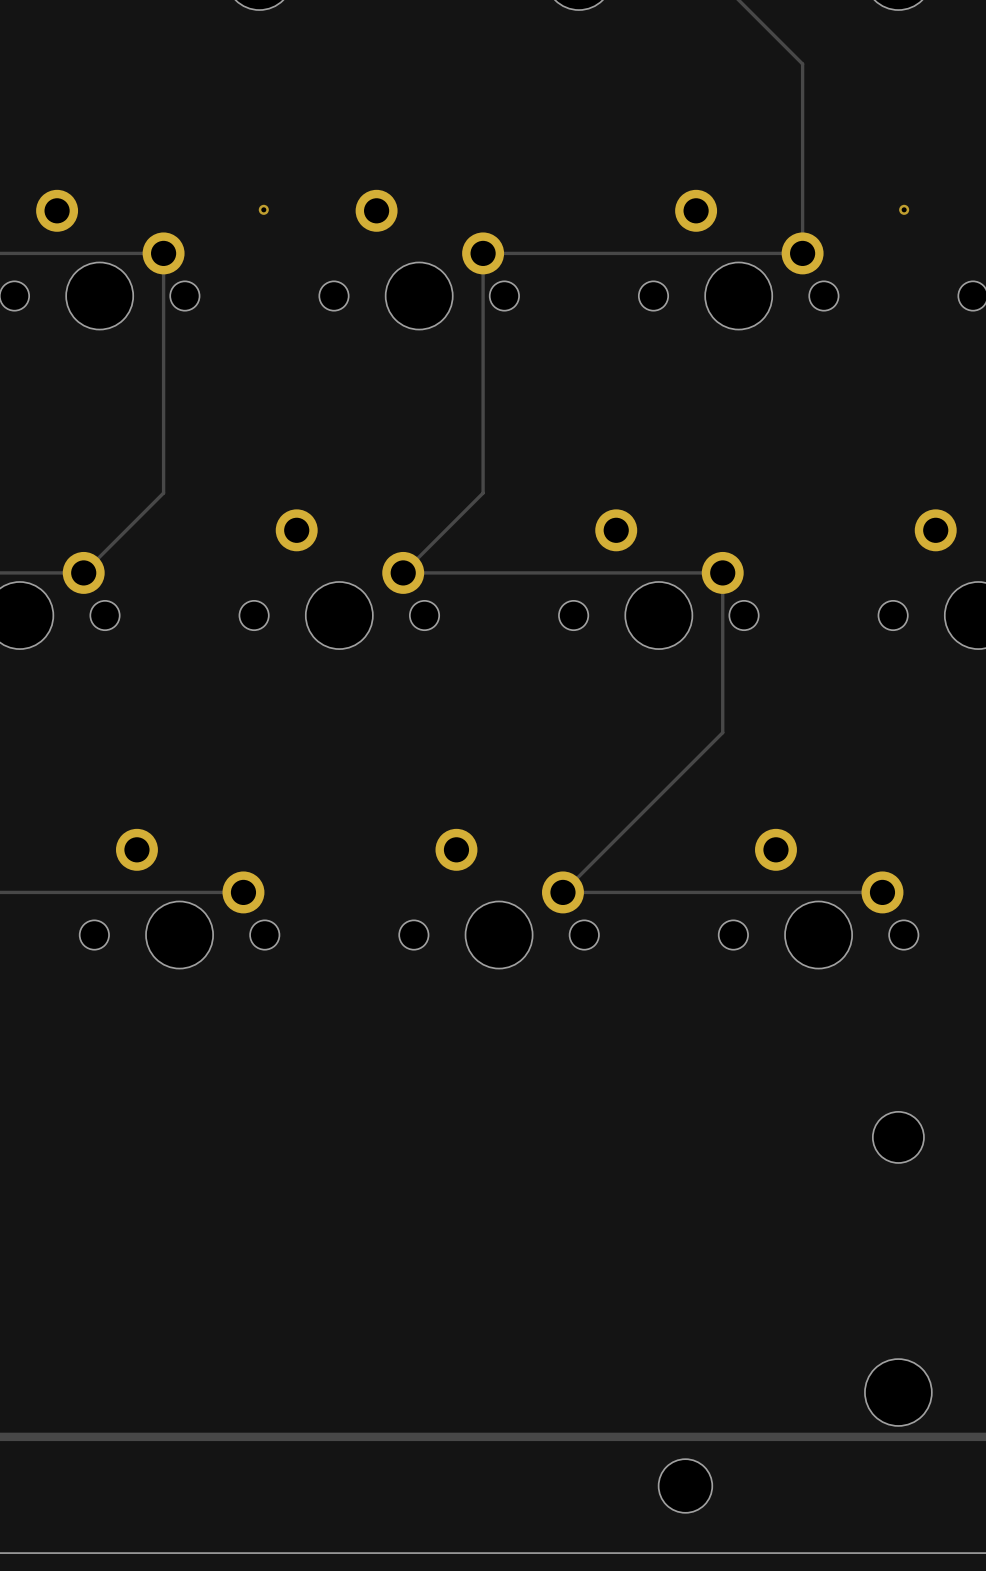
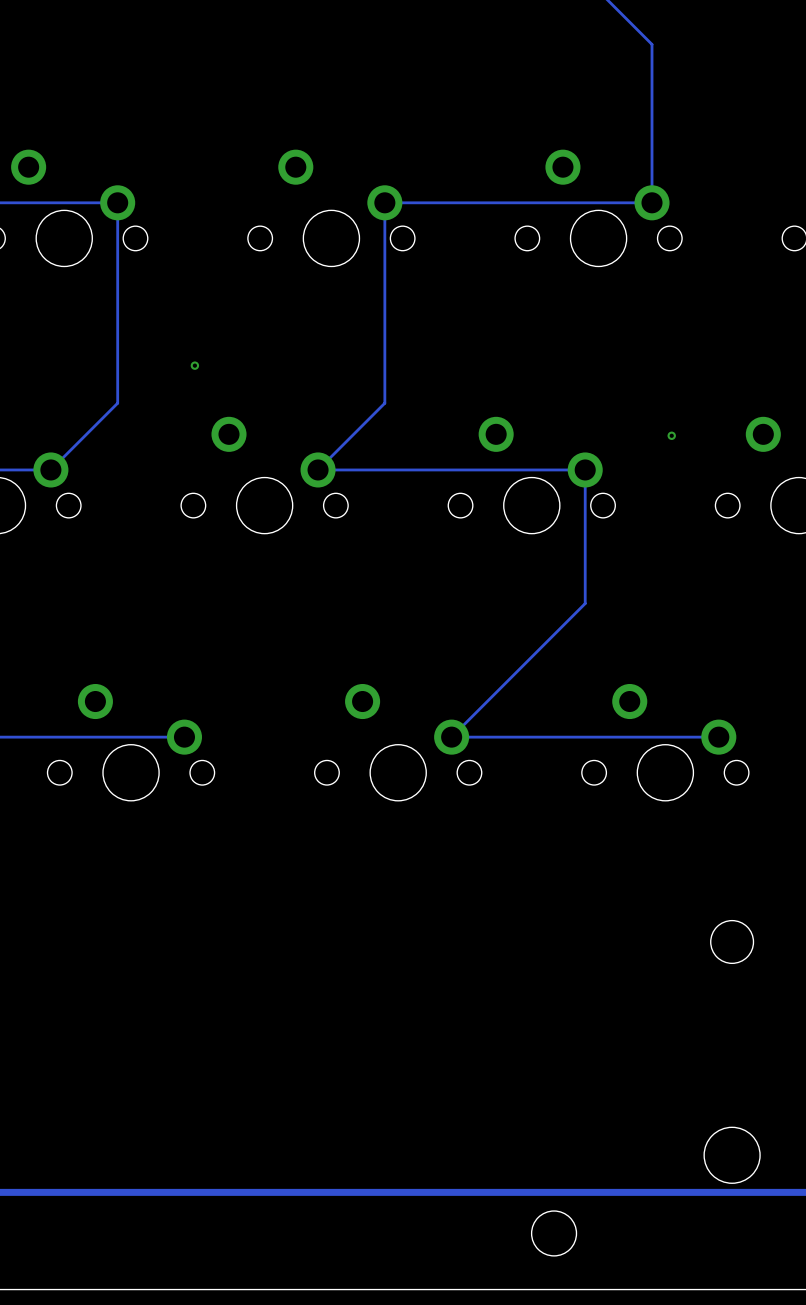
via: (263, 209) -> none
via: (904, 209) -> none
via: none -> (194, 365)
via: none -> (671, 435)

